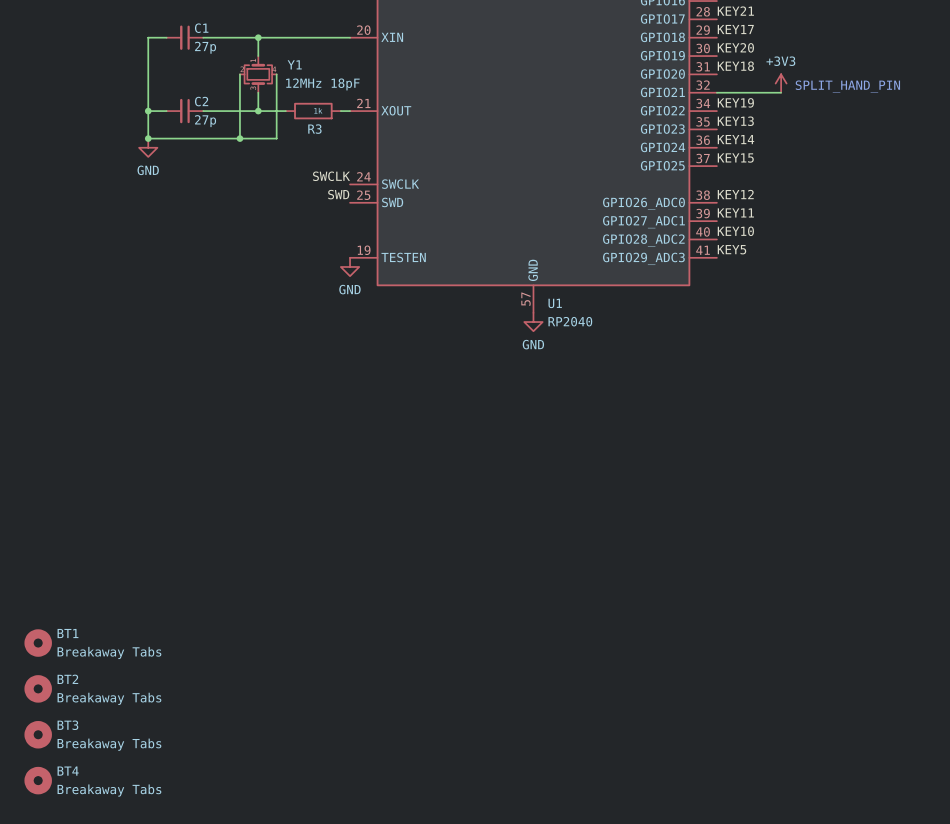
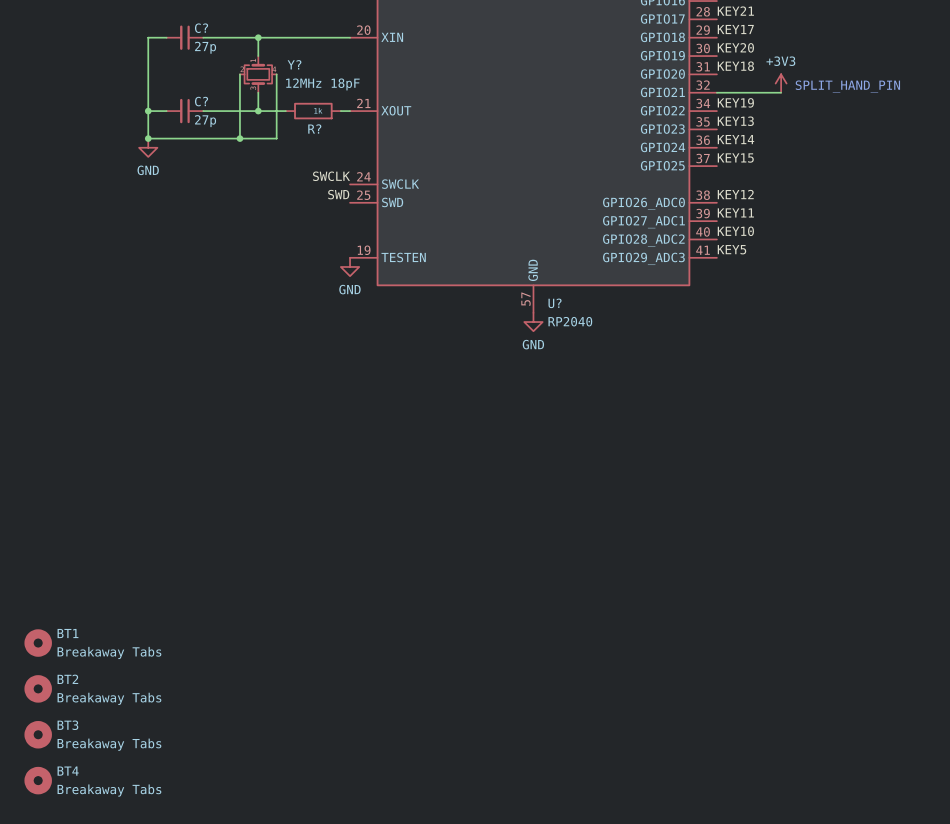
C1 name: C1 (201, 28) -> C? (201, 28)
Y1 name: Y1 (294, 64) -> Y? (294, 64)
C2 name: C2 (201, 101) -> C? (201, 101)
R3 name: R3 (314, 129) -> R? (314, 128)
U1 name: U1 (555, 303) -> U? (555, 303)

